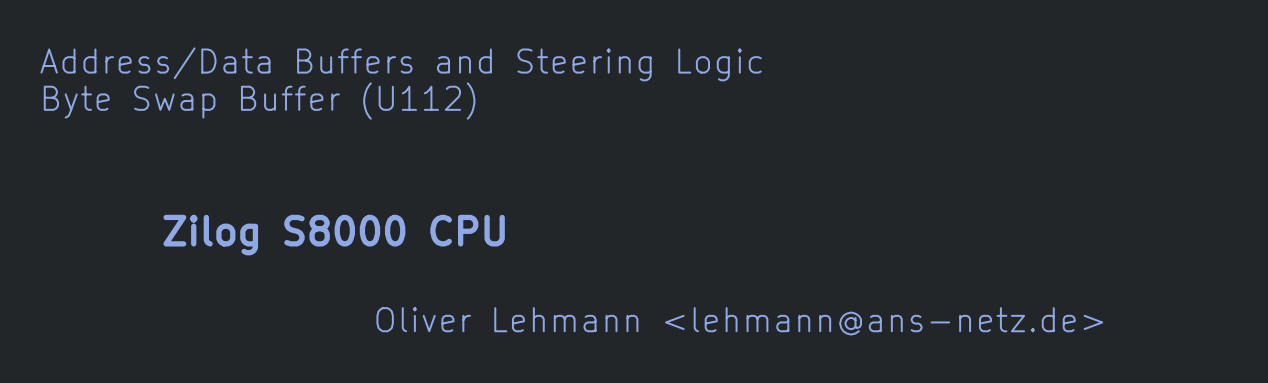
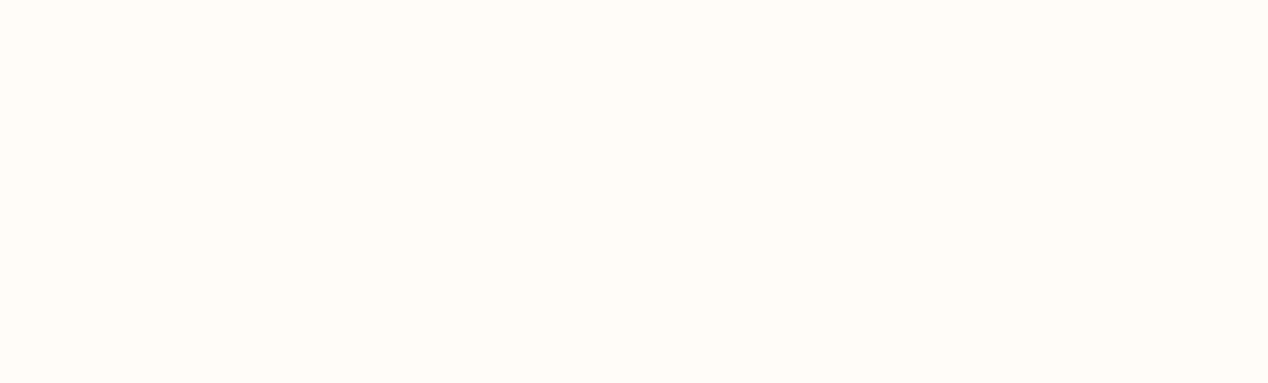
text: Address/Data Buffers and Steering Logic (401, 64) -> none
text: Byte Swap Buffer (U112) (259, 101) -> none
text: Zilog S8000 CPU (334, 235) -> none
text: Oliver Lehmann <lehmann@ans-netz.de> (739, 321) -> none

